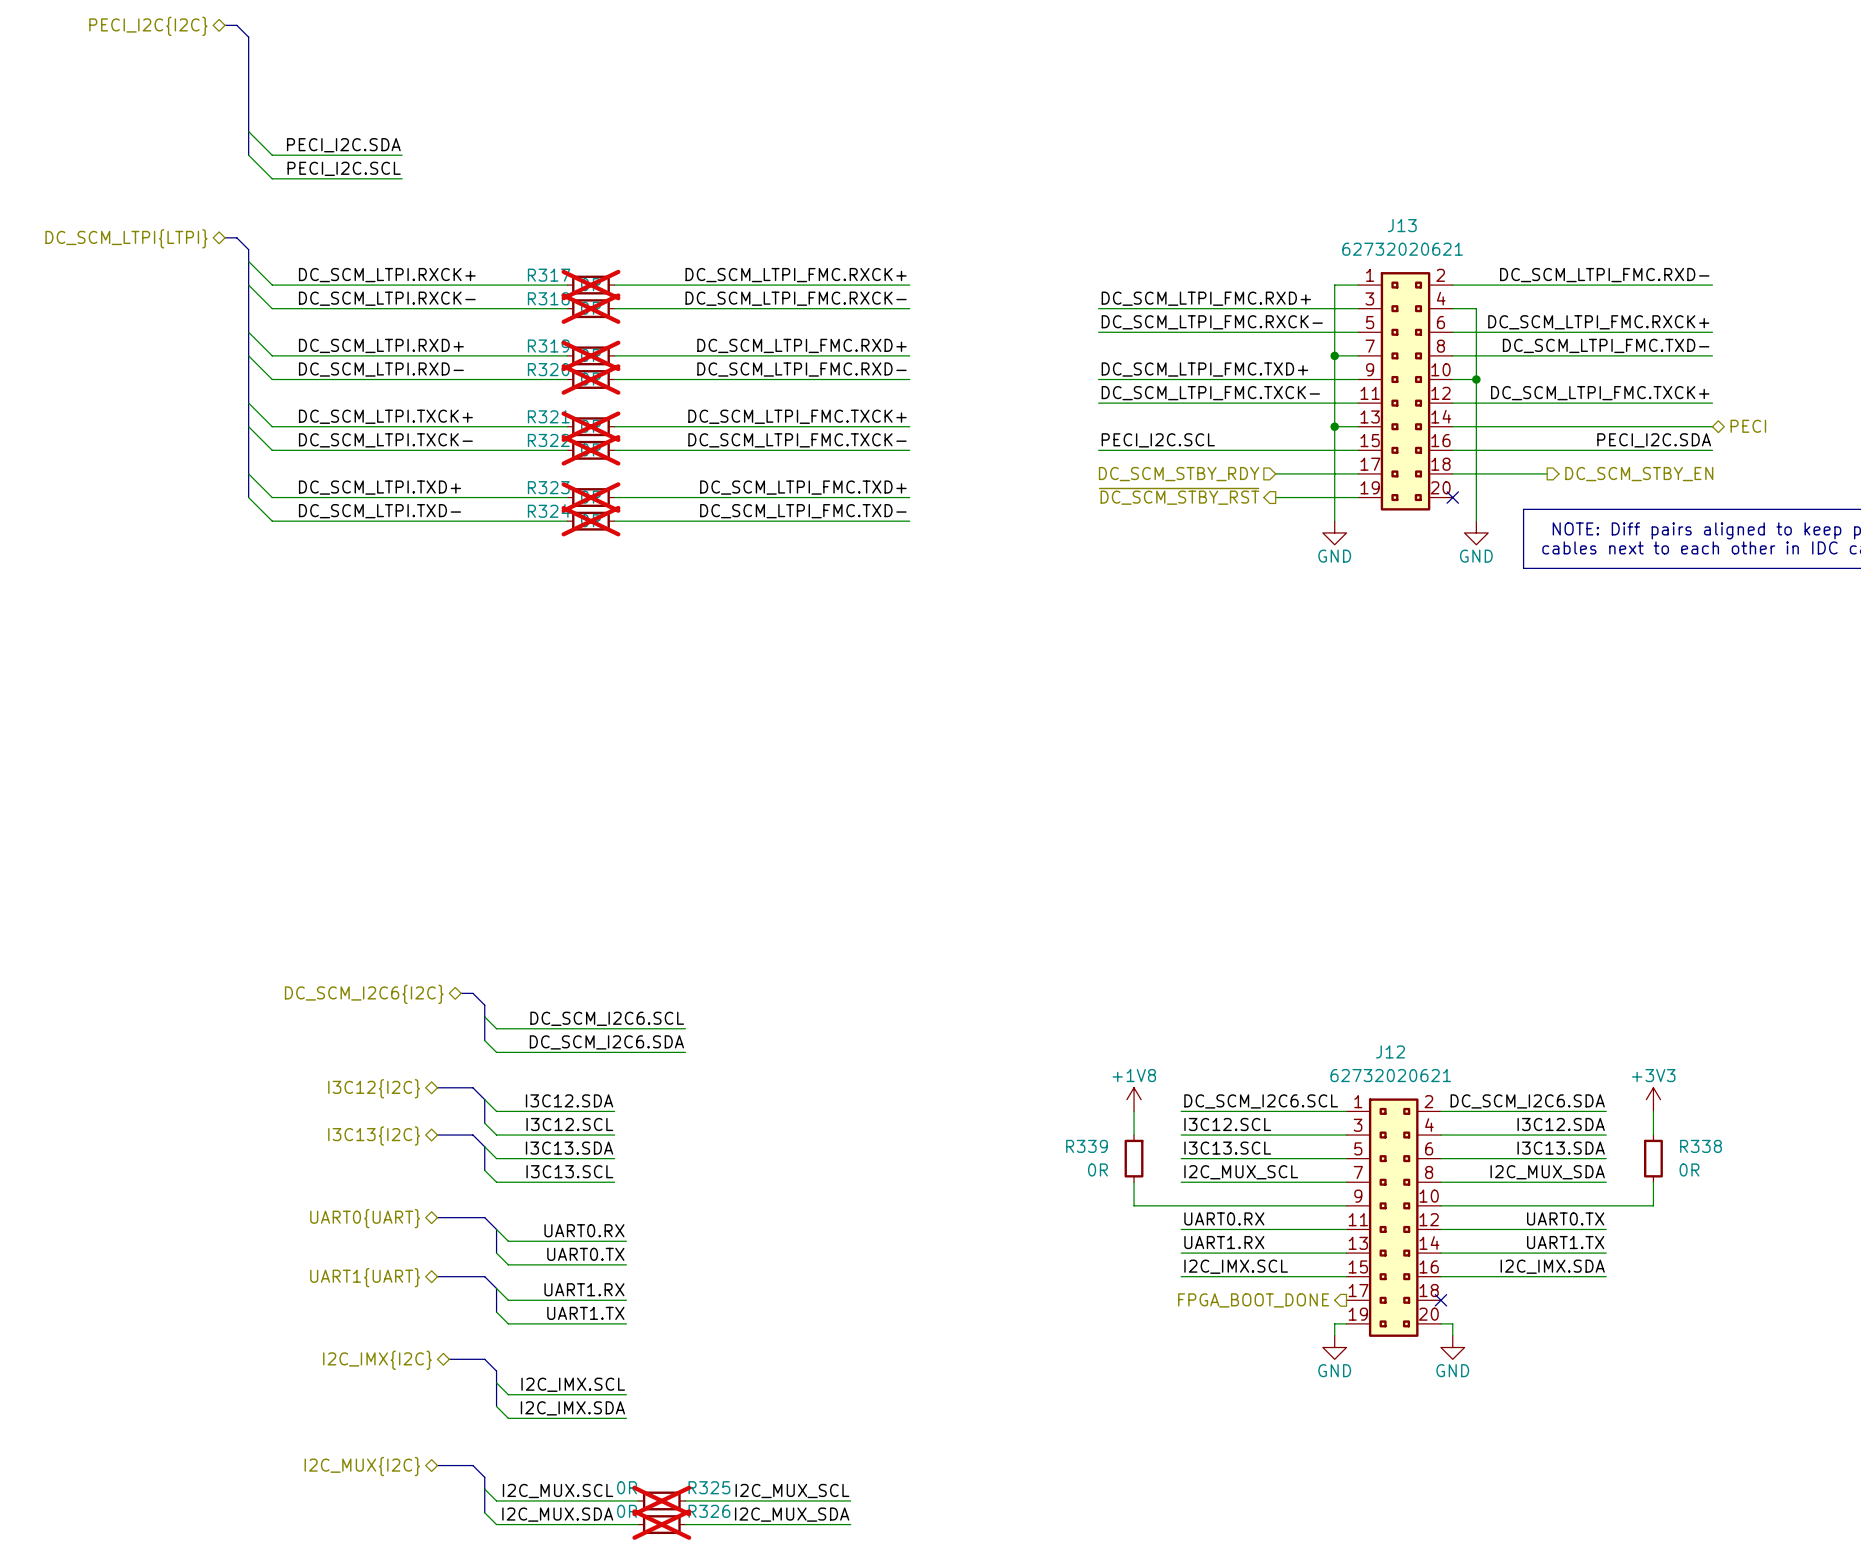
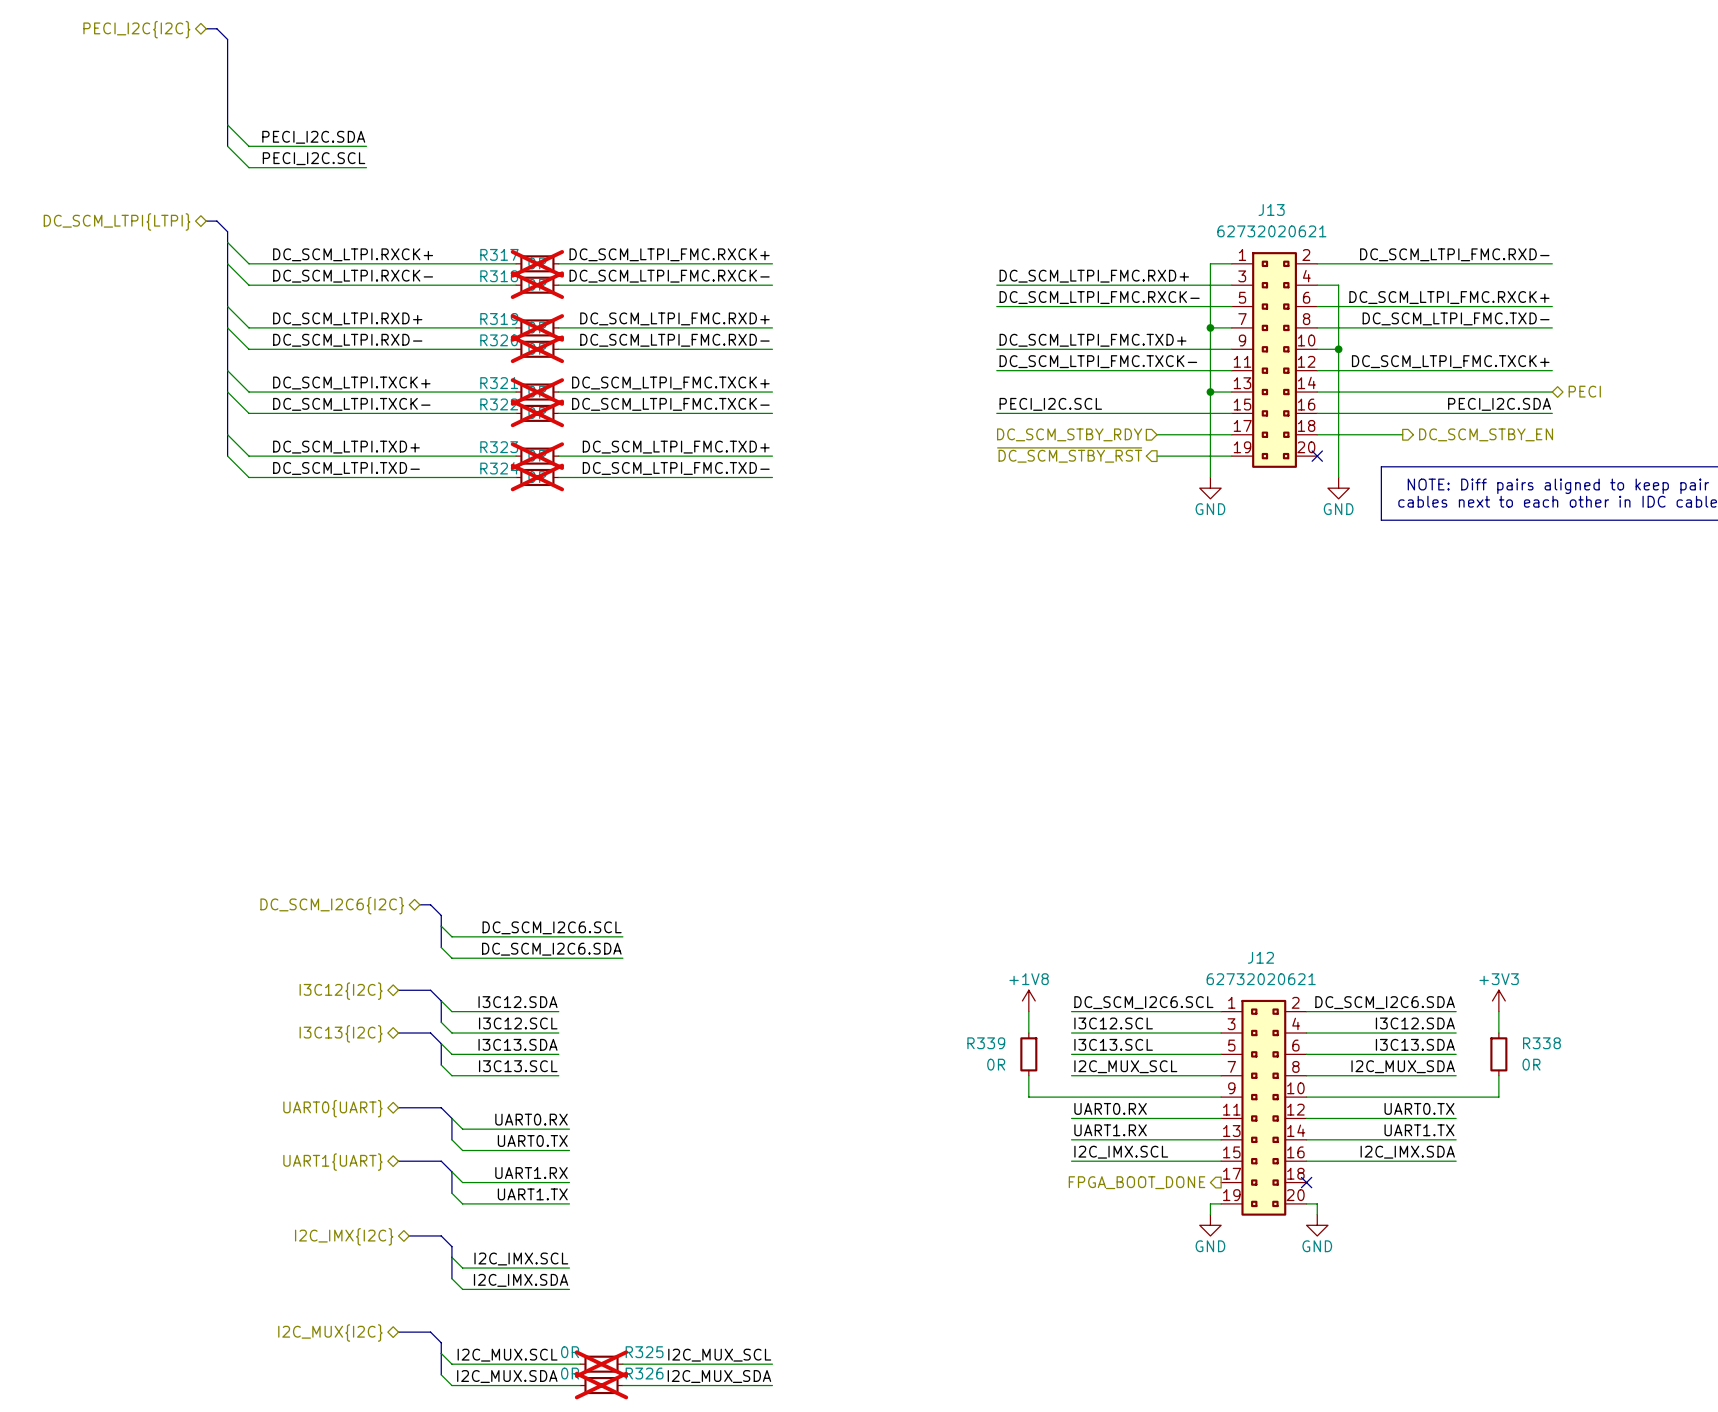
label position: DC_SCM_LTPI_FMC.RXCK+ (796, 275) -> DC_SCM_LTPI_FMC.RXCK+ (669, 254)
wire: (850, 285) (909, 285) -> none
label position: DC_SCM_LTPI_FMC.RXCK- (796, 298) -> DC_SCM_LTPI_FMC.RXCK- (669, 276)
wire: (850, 308) (909, 308) -> none
label position: DC_SCM_LTPI_FMC.RXD+ (801, 345) -> DC_SCM_LTPI_FMC.RXD+ (674, 318)
wire: (850, 355) (909, 355) -> none
label position: DC_SCM_LTPI_FMC.RXD- (801, 369) -> DC_SCM_LTPI_FMC.RXD- (674, 340)
wire: (850, 379) (909, 379) -> none
label position: DC_SCM_LTPI_FMC.TXCK+ (797, 416) -> DC_SCM_LTPI_FMC.TXCK+ (670, 383)
wire: (850, 426) (909, 426) -> none
label position: DC_SCM_LTPI_FMC.TXCK- (797, 440) -> DC_SCM_LTPI_FMC.TXCK- (670, 404)
wire: (850, 450) (909, 450) -> none
label position: DC_SCM_LTPI_FMC.TXD+ (803, 487) -> DC_SCM_LTPI_FMC.TXD+ (676, 447)
wire: (850, 497) (909, 497) -> none
label position: DC_SCM_LTPI_FMC.TXD- (803, 511) -> DC_SCM_LTPI_FMC.TXD- (676, 468)
wire: (850, 521) (909, 521) -> none

